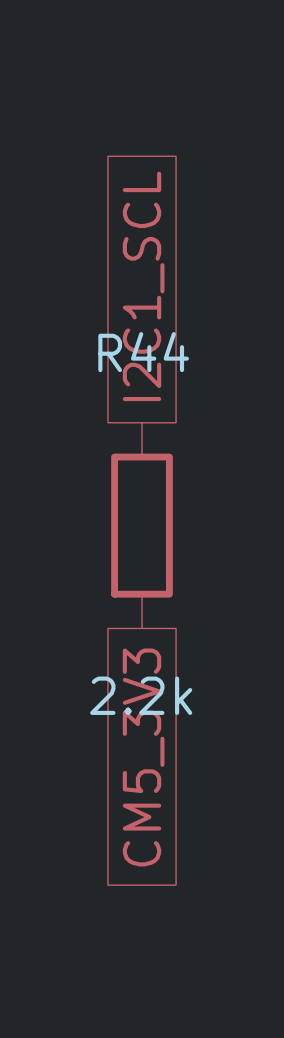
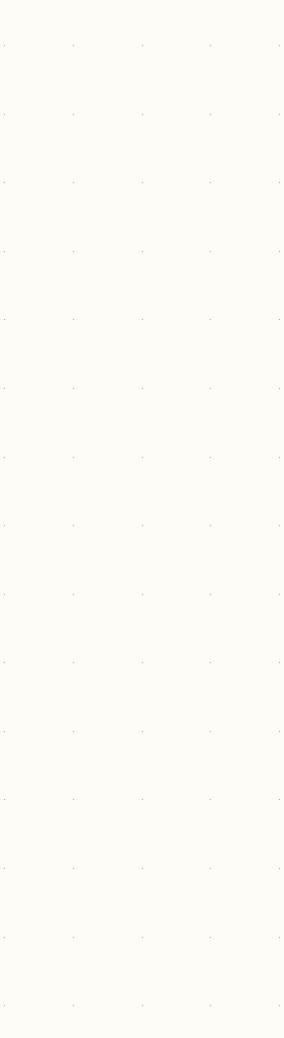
global label: I2C1_SCL (143, 286) -> none
R44: 2.2k (142, 525) -> none
global label: CM5_3V3 (143, 757) -> none

